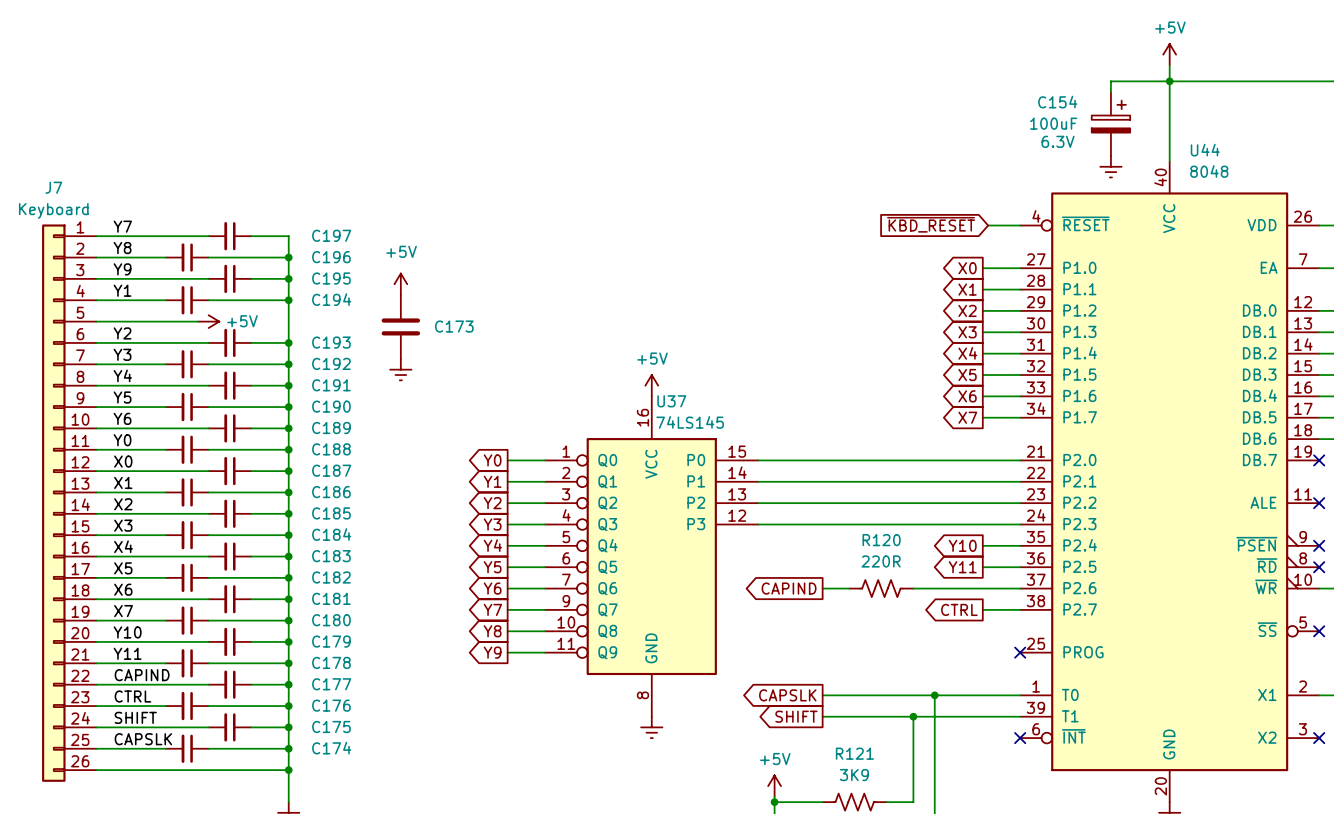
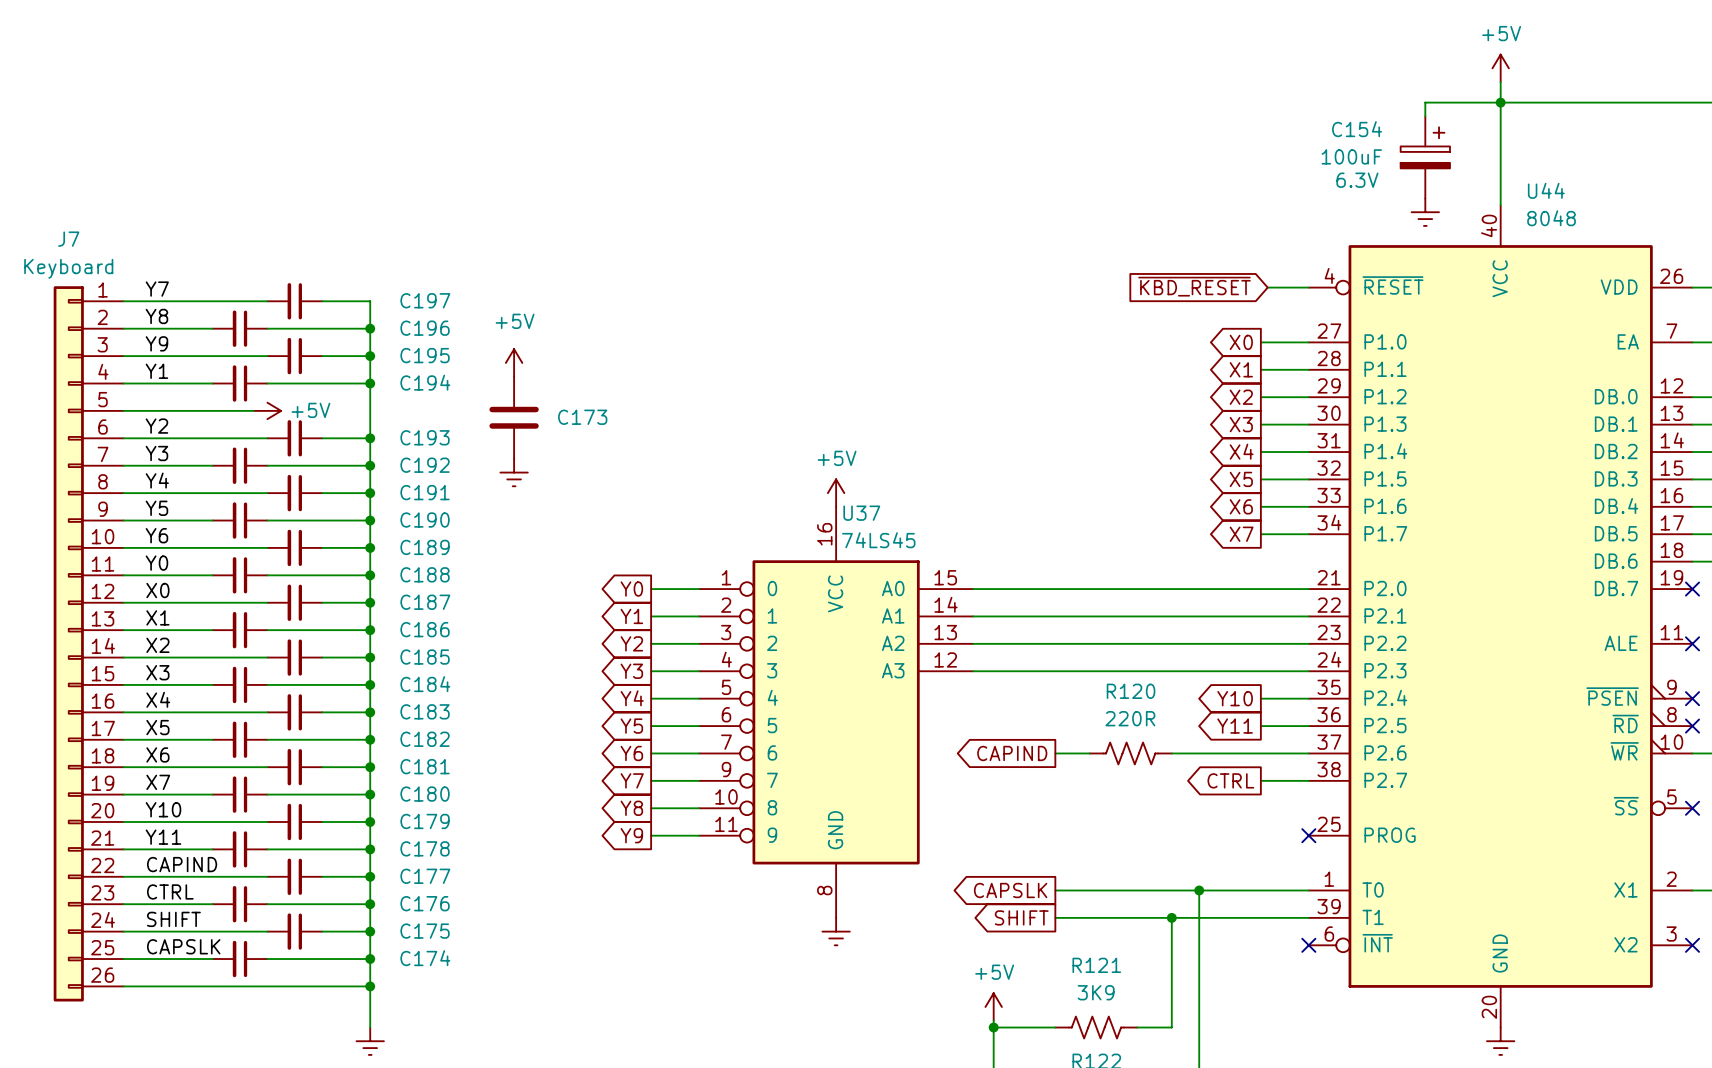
U37 symbol: [545, 396, 759, 717] -> [699, 506, 974, 918]
U37 value: 74LS145 (690, 422) -> 74LS45 (878, 540)

